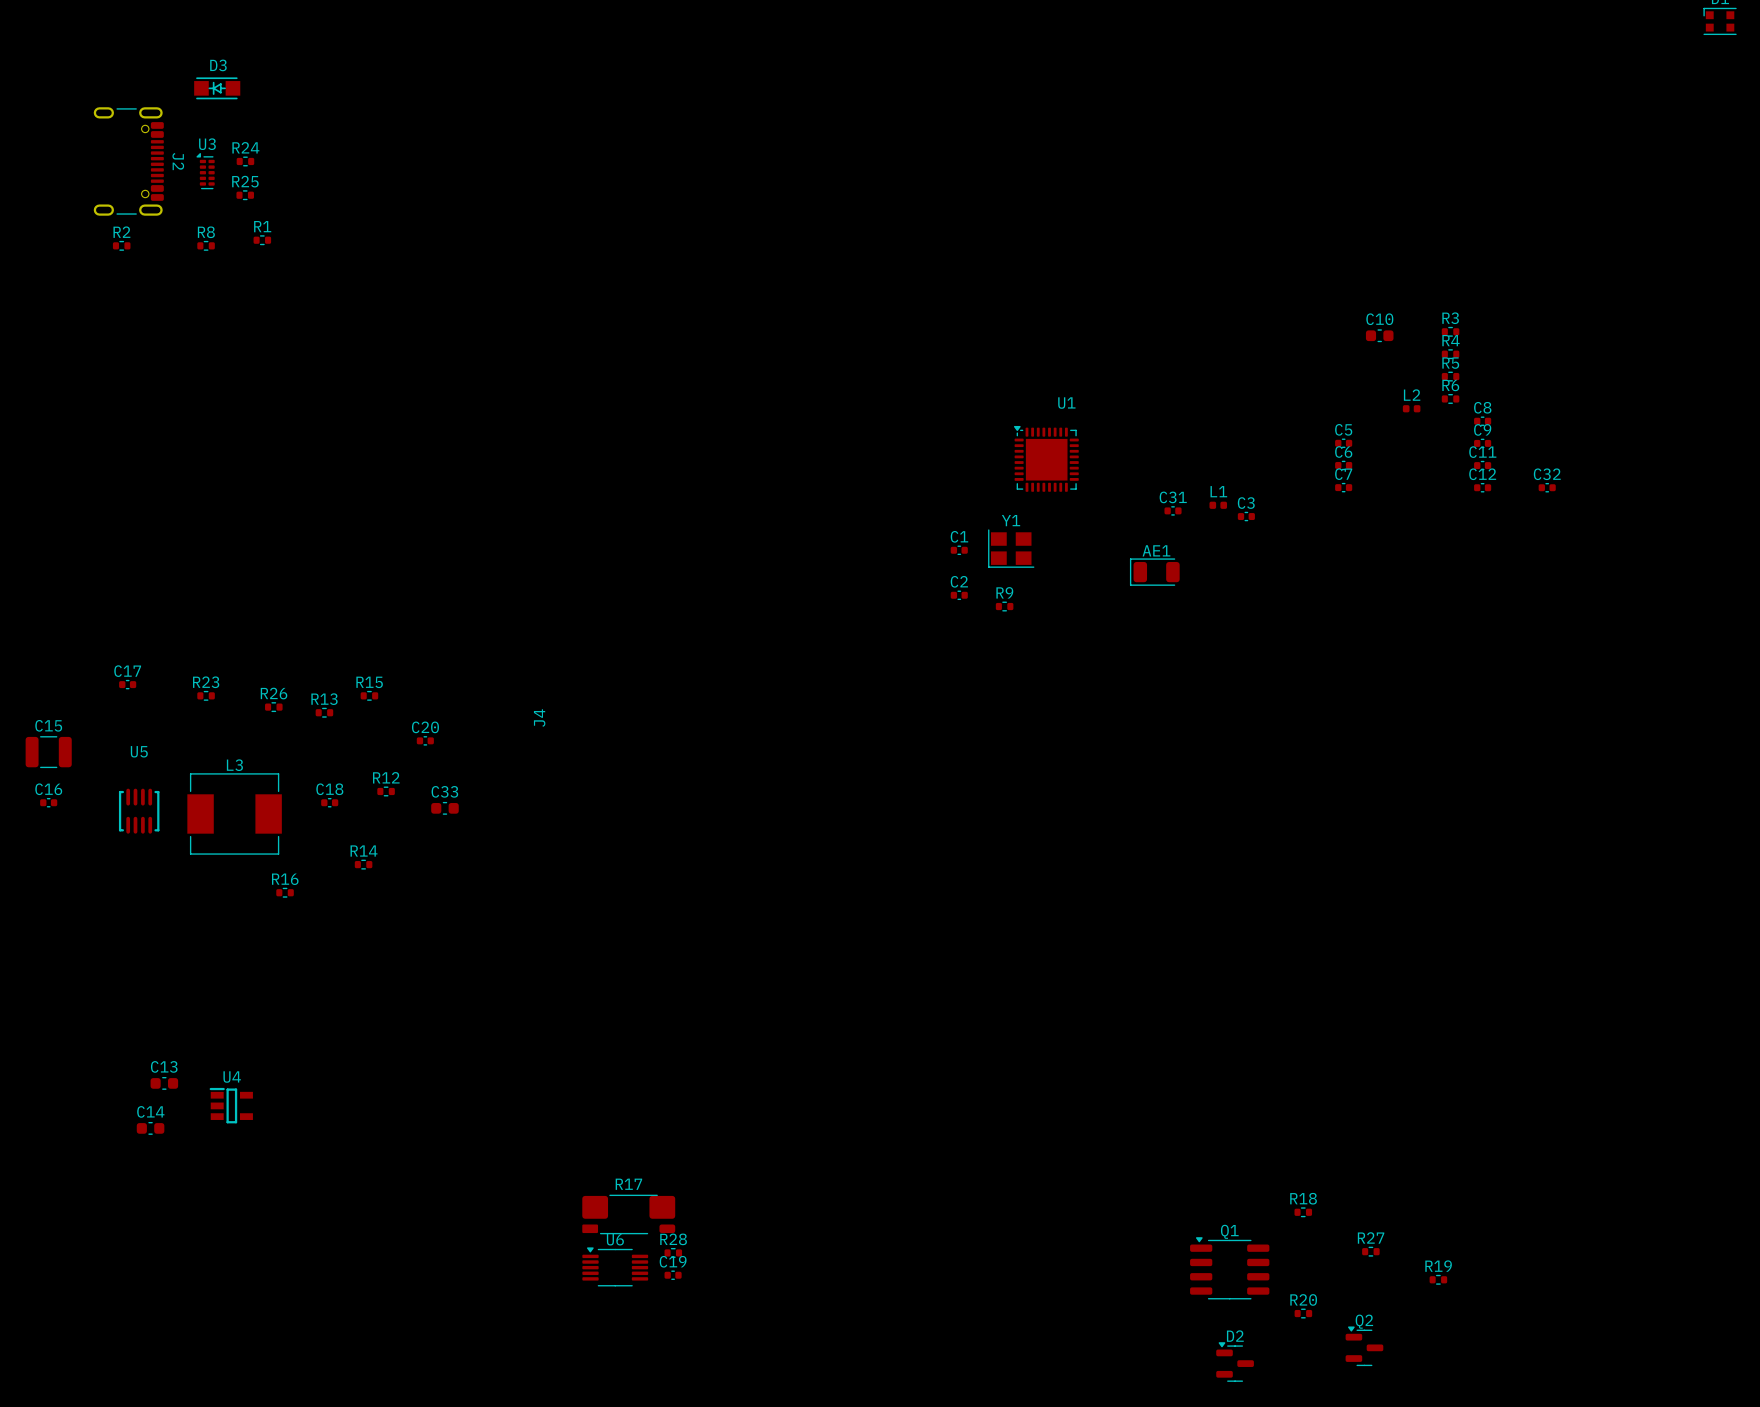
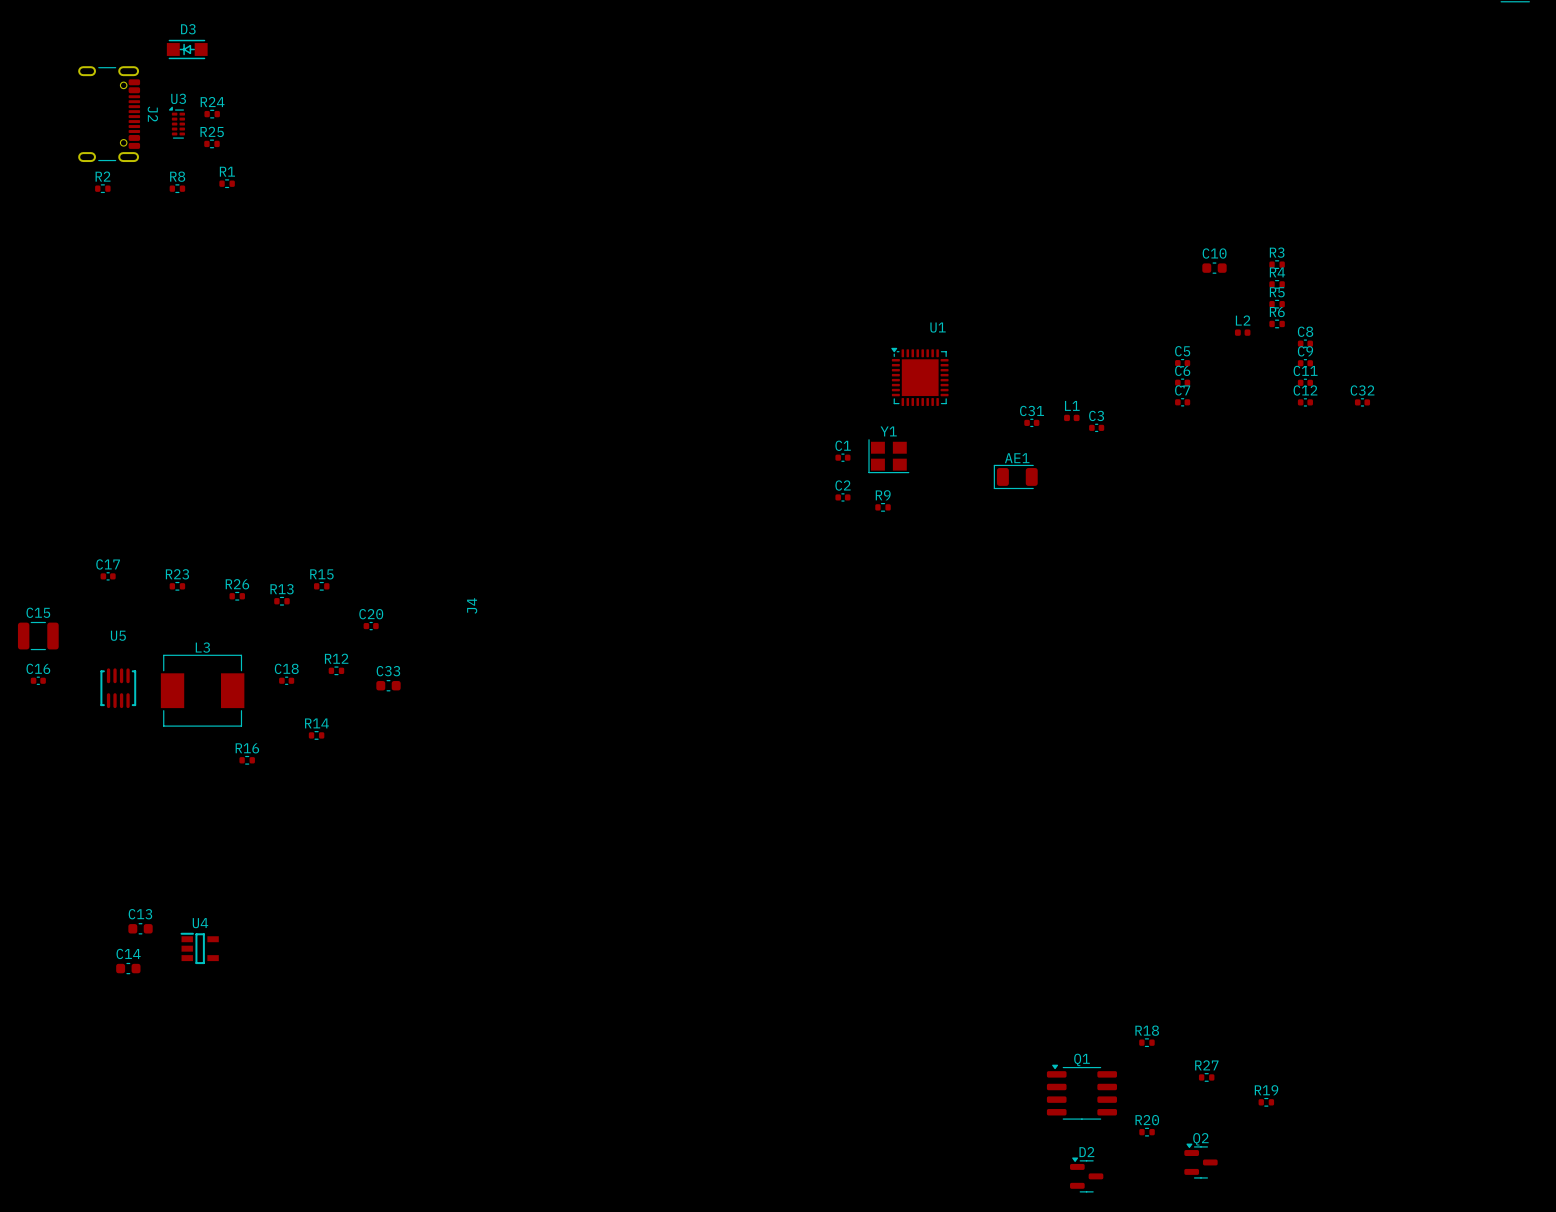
R17: (628, 1214) -> none
R28: (673, 1252) -> none
U6: (615, 1266) -> none
C19: (673, 1275) -> none

